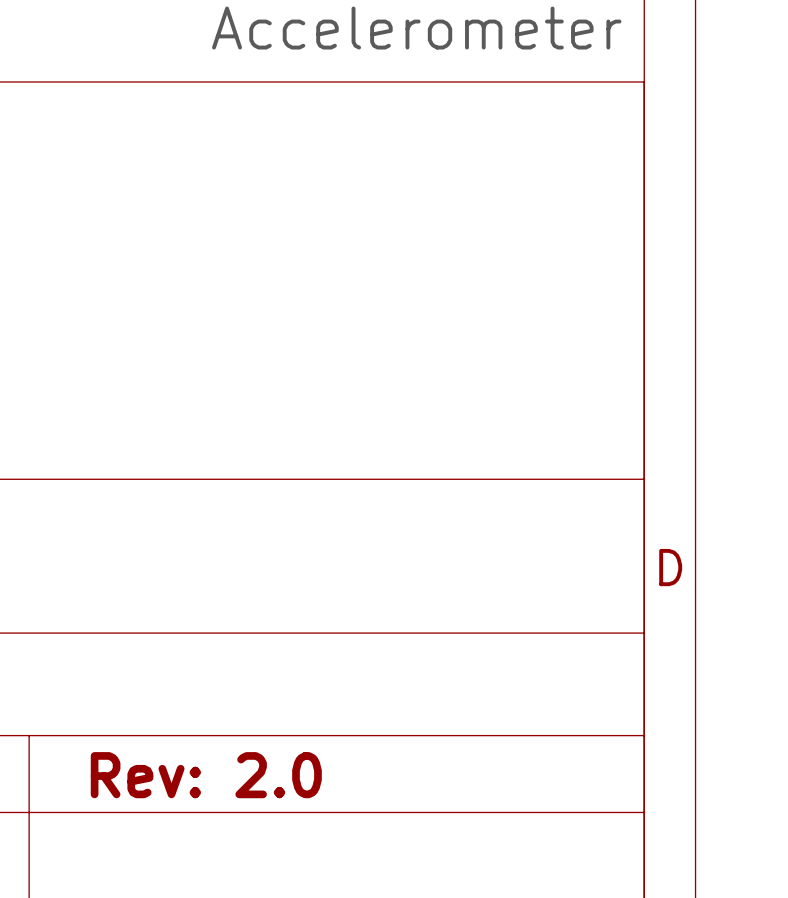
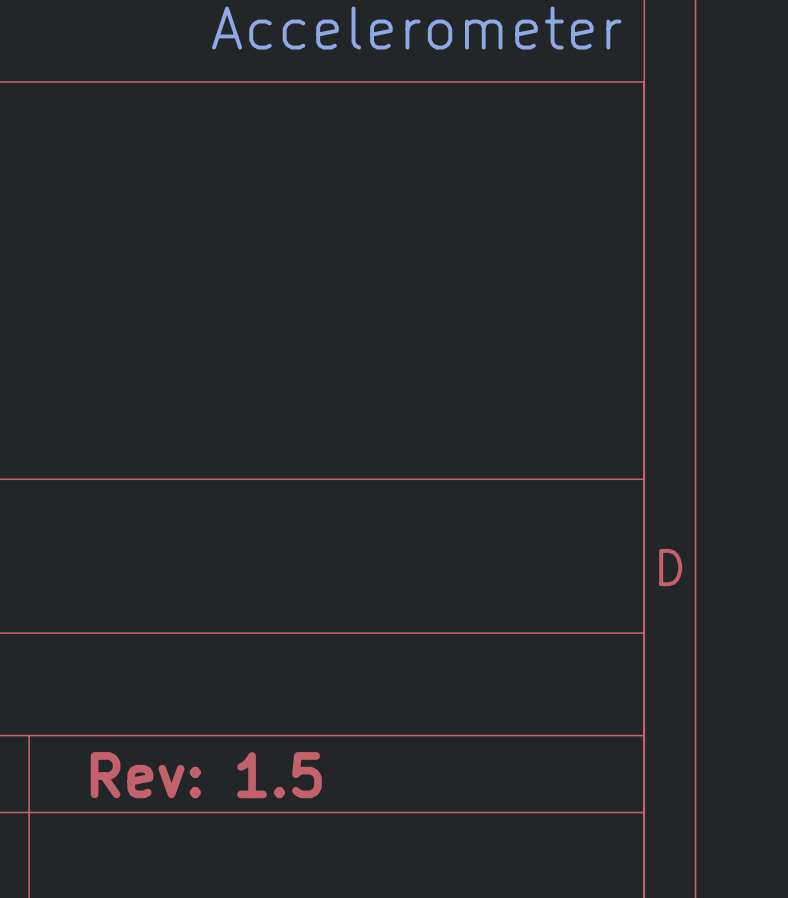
title block: Rev: 2.0 (206, 775) -> Rev: 1.5 (206, 775)

